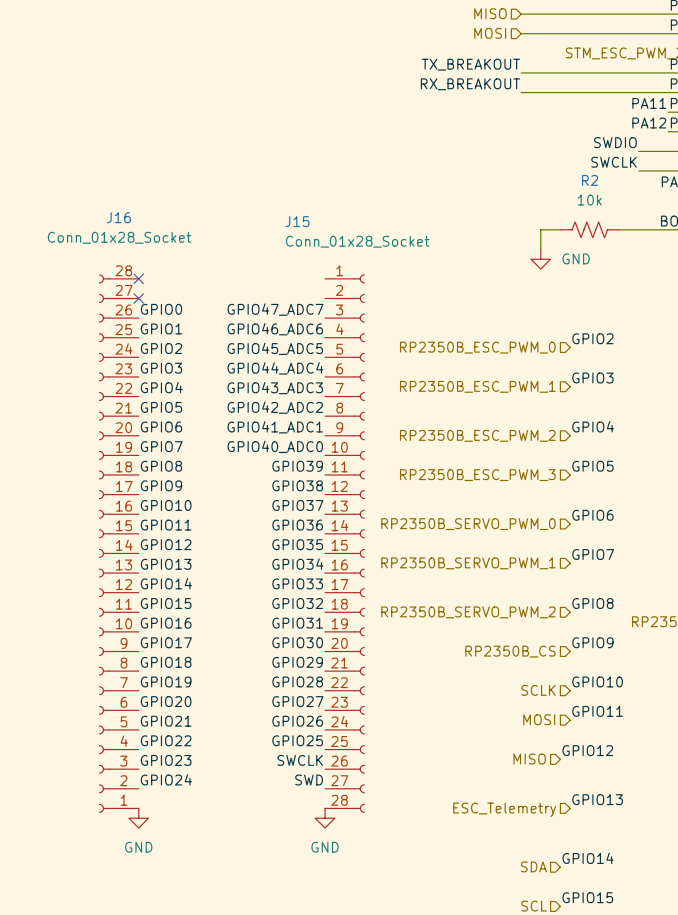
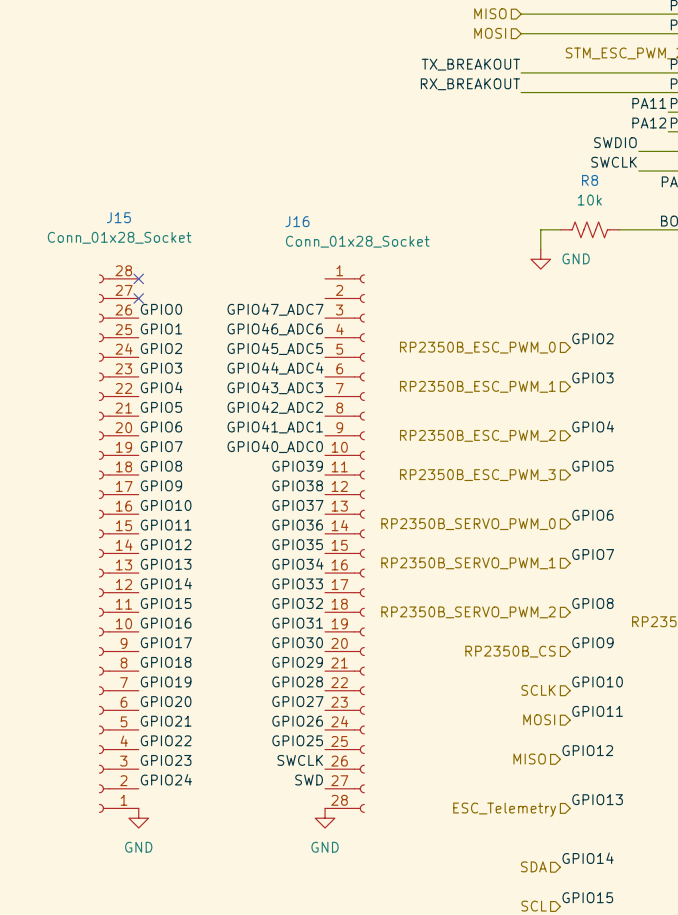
R2 name: R2 (590, 180) -> R8 (590, 180)
J16 name: J16 (118, 217) -> J15 (118, 217)
J15 name: J15 (297, 221) -> J16 (297, 221)

